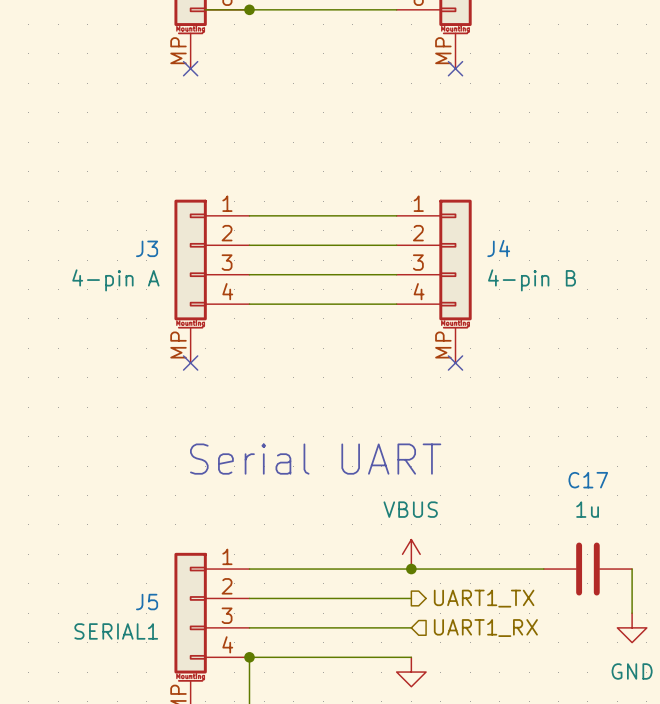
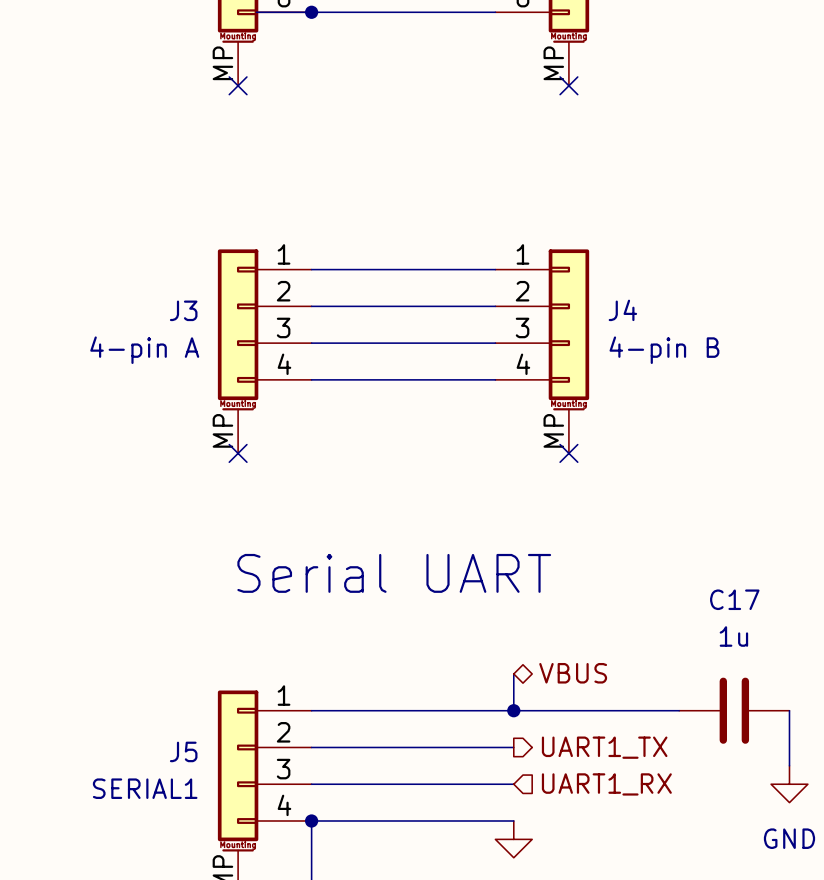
hierarchical label: none -> VBUS (573, 673)
power symbol: VBUS (411, 554) -> none

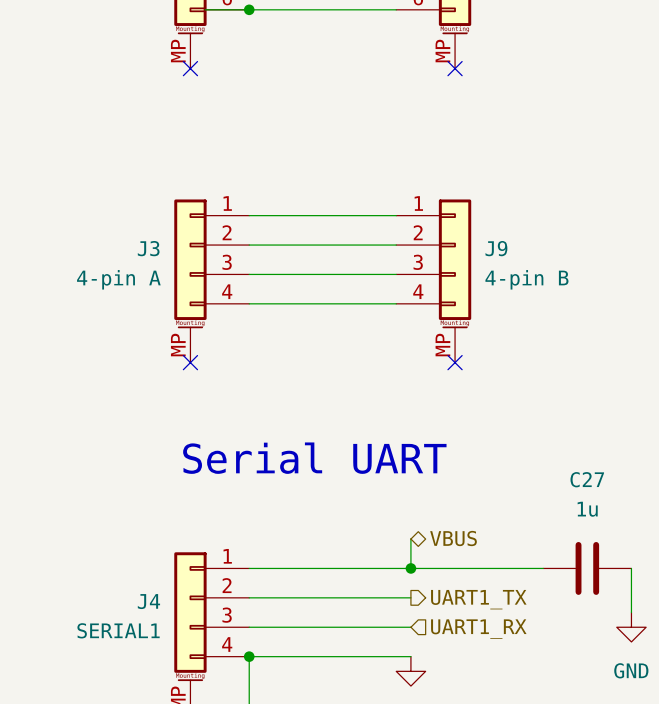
J4 name: J4 (622, 310) -> J9 (496, 248)
C17 name: C17 (734, 599) -> C27 (587, 479)
J5 name: J5 (183, 751) -> J4 (148, 601)

